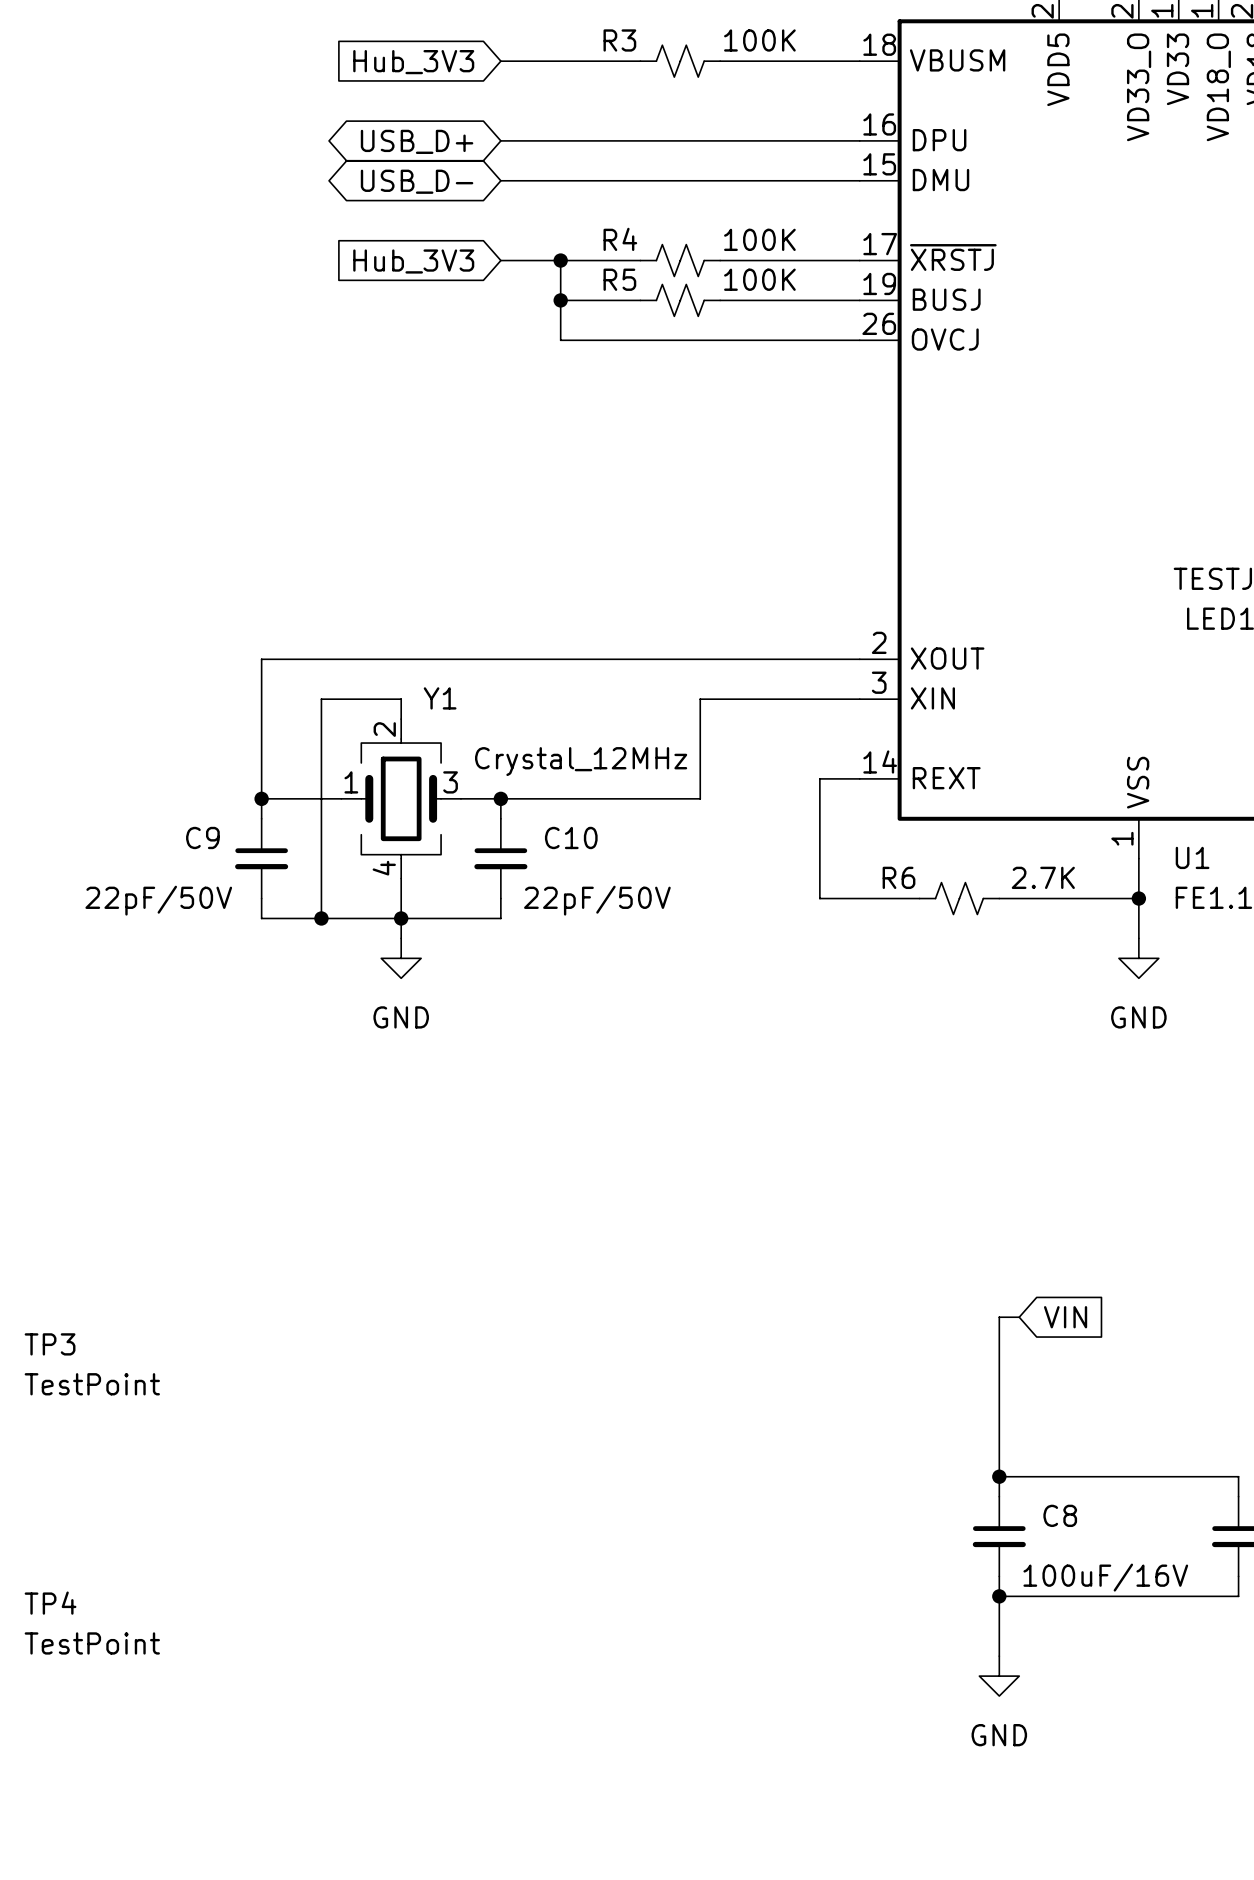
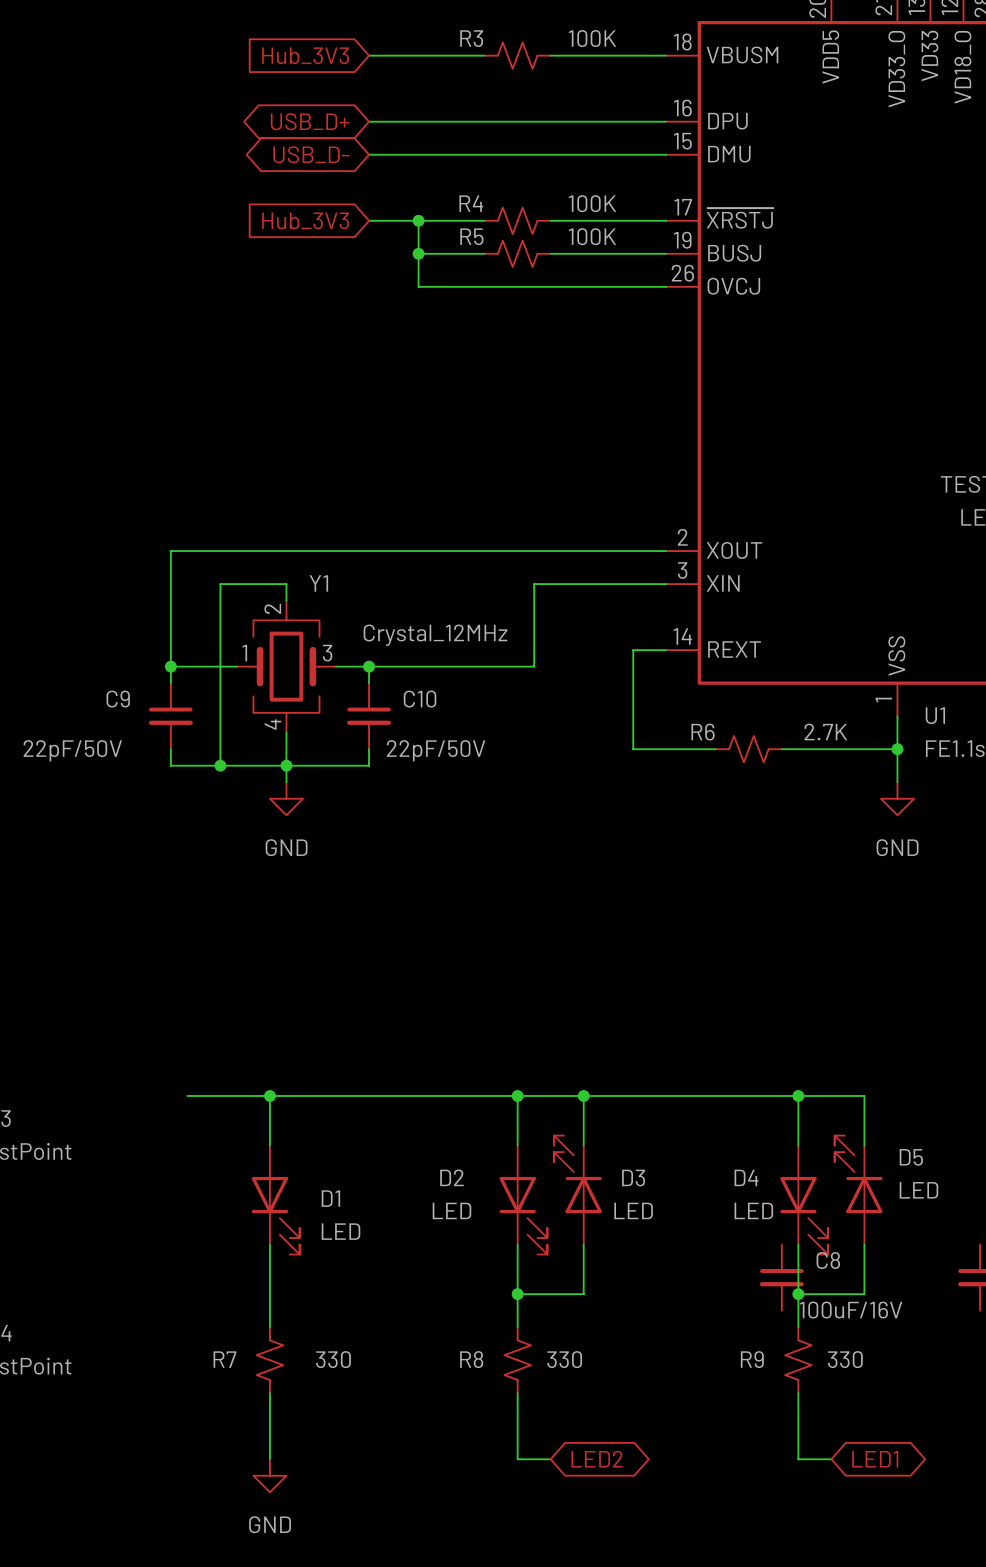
wire: none -> (269, 1095) (269, 1145)
junction: none -> (269, 1095)
wire: none -> (517, 1095) (517, 1145)
junction: none -> (517, 1095)
wire: none -> (583, 1095) (583, 1145)
junction: none -> (583, 1095)
wire: (999, 1317) (999, 1496) -> (781, 1095) (187, 1095)
junction: none -> (798, 1095)
global label: VIN (1065, 1317) -> none
wire: none -> (798, 1145) (798, 1095) (864, 1095) (864, 1145)
D3: none -> LED (577, 1190)
D5: none -> LED (858, 1190)
D1: none -> LED (275, 1200)
D2: none -> LED (523, 1200)
D4: none -> LED (804, 1200)
wire: (999, 1476) (1238, 1476) (1238, 1496) -> none
junction: (999, 1476) -> none
wire: none -> (269, 1244) (269, 1327)
wire: none -> (517, 1244) (517, 1327)
wire: none -> (583, 1244) (583, 1294) (517, 1294)
wire: none -> (798, 1244) (798, 1327)
wire: none -> (864, 1244) (864, 1294) (798, 1294)
junction: none -> (517, 1294)
junction: none -> (798, 1294)
wire: (999, 1576) (999, 1656) -> none
wire: (1238, 1576) (1238, 1596) (999, 1596) -> none
junction: (999, 1596) -> none
R7: none -> 330 (269, 1360)
R8: none -> 330 (517, 1360)
R9: none -> 330 (798, 1360)
wire: none -> (269, 1393) (269, 1459)
wire: none -> (517, 1393) (517, 1459) (550, 1459)
power symbol: GND (999, 1676) -> none
wire: none -> (798, 1393) (798, 1459) (831, 1459)
global label: none -> LED2 (597, 1459)
global label: none -> LED1 (875, 1459)
power symbol: none -> GND (269, 1475)

